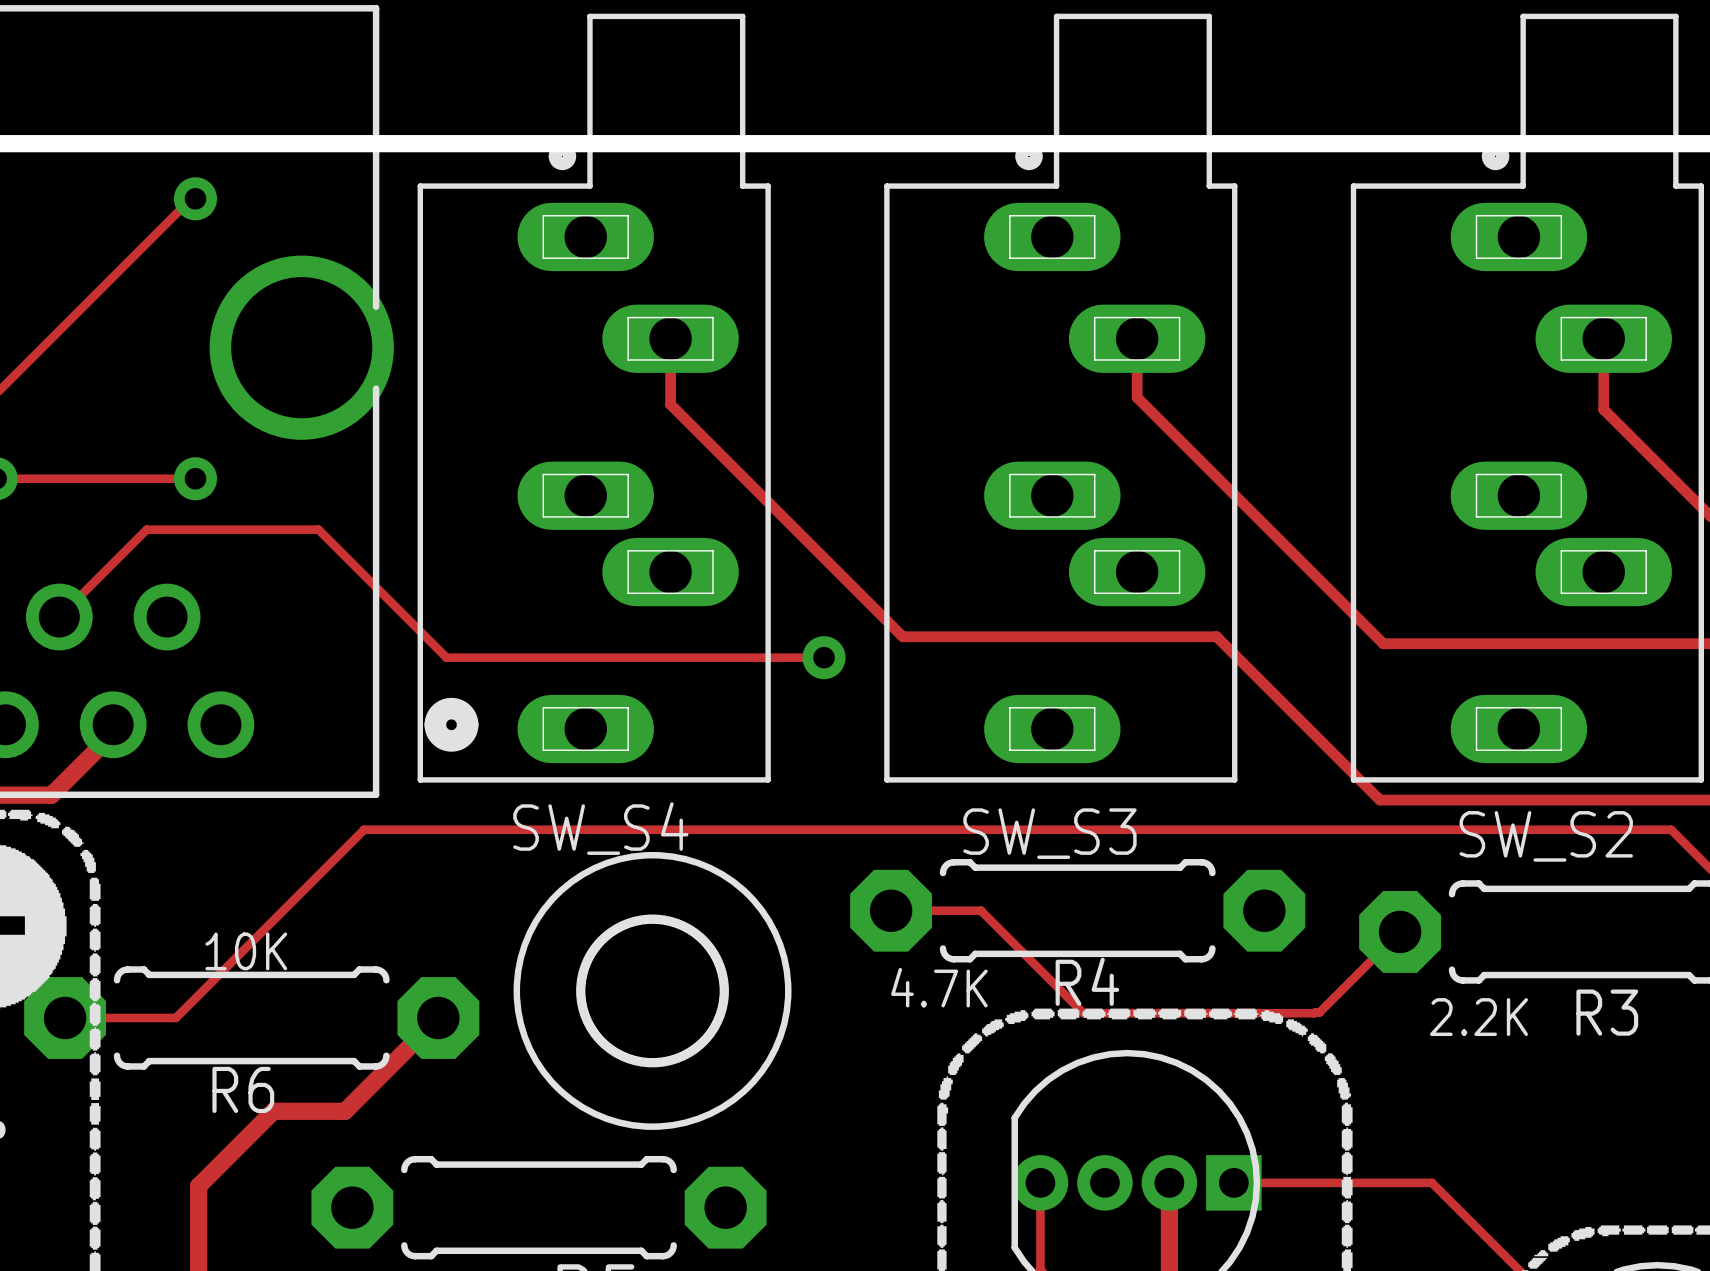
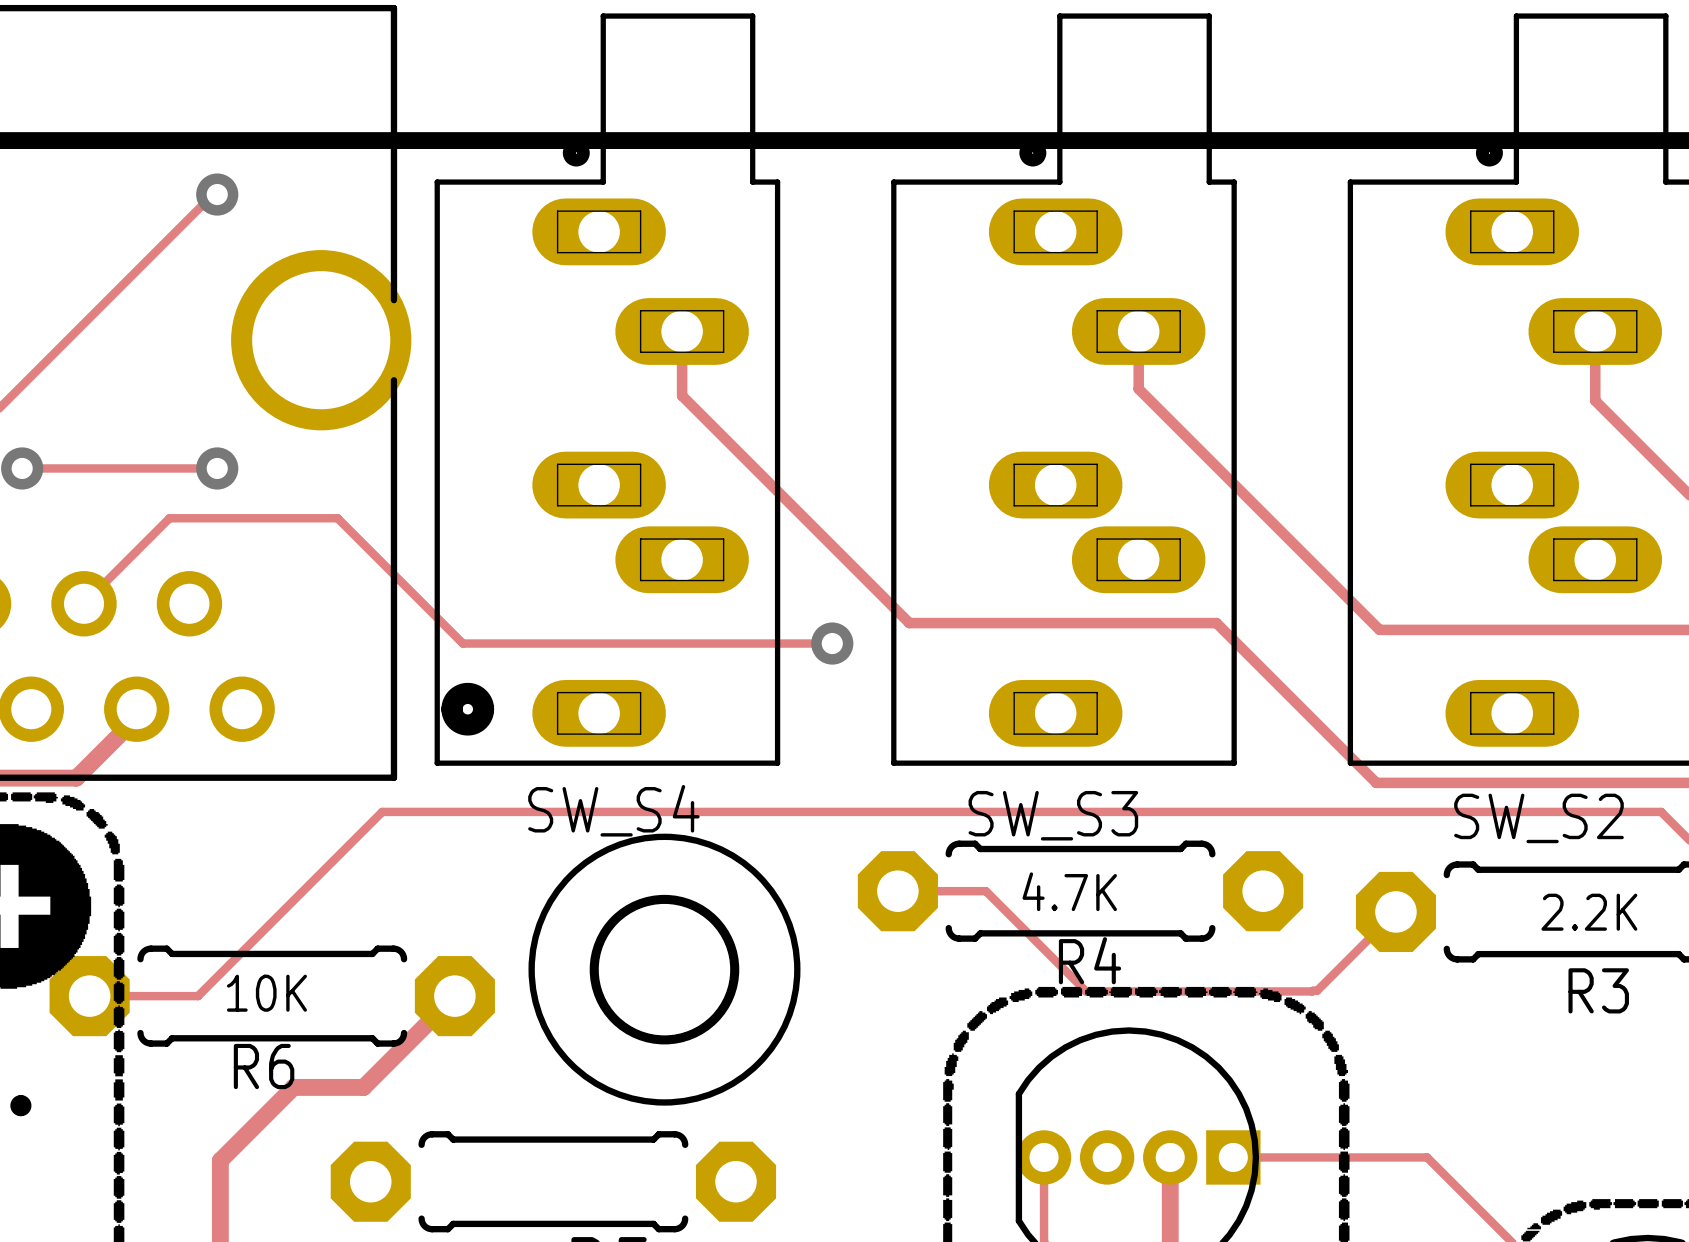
R6 value position: 10K (246, 951) -> 10K (266, 993)
R4 value position: 4.7K (939, 987) -> 4.7K (1069, 891)
R3 value position: 2.2K (1478, 1017) -> 2.2K (1589, 912)

